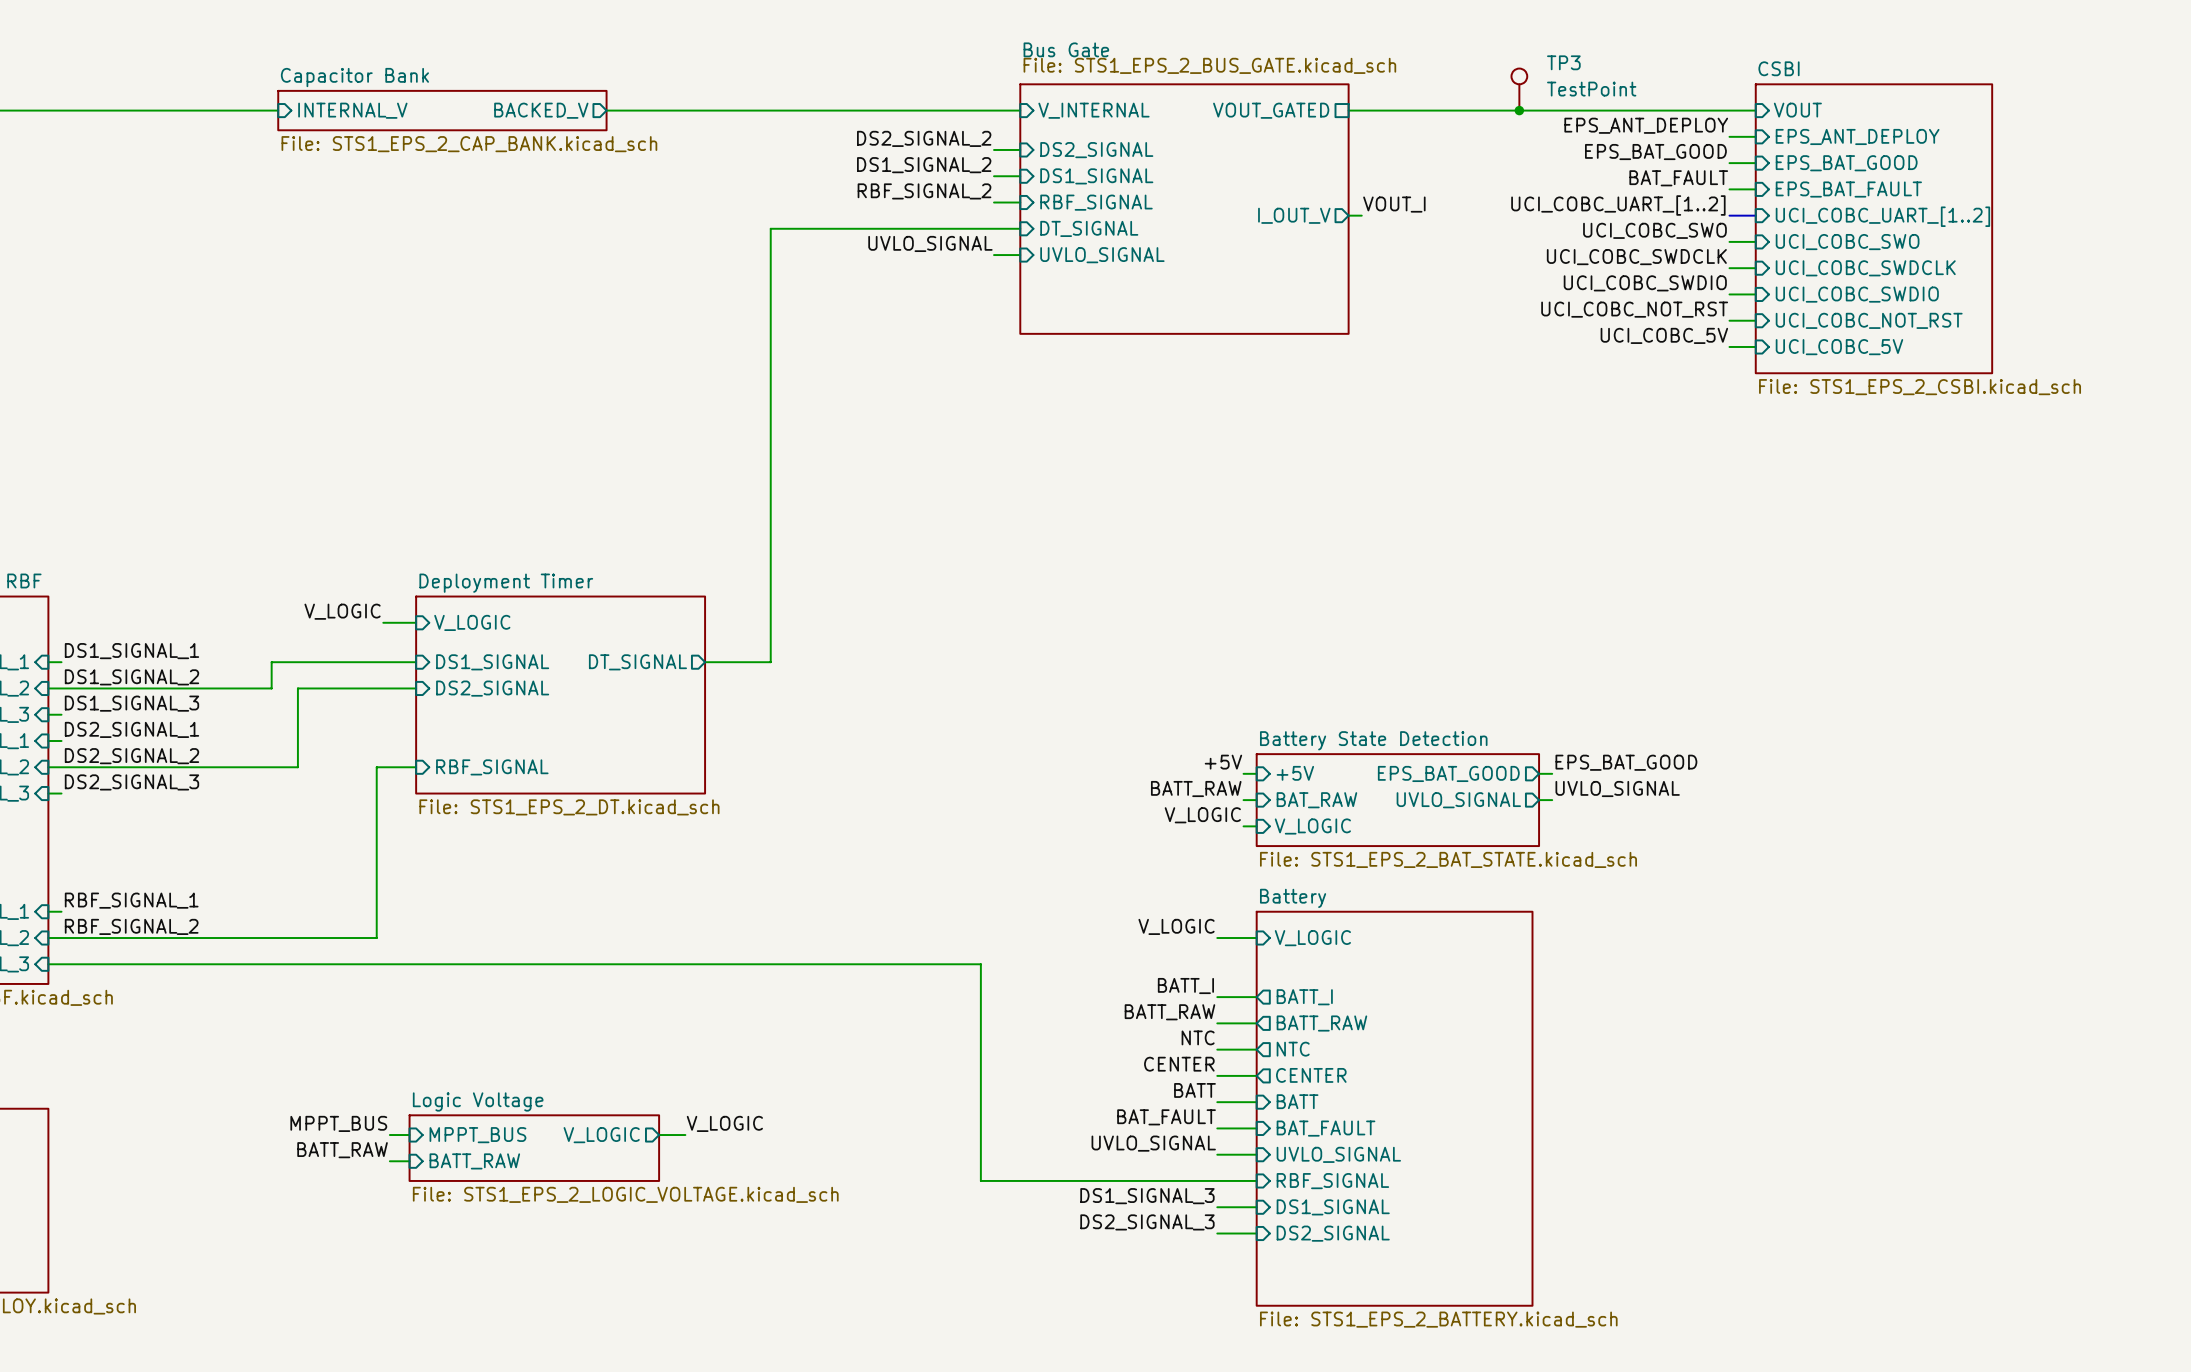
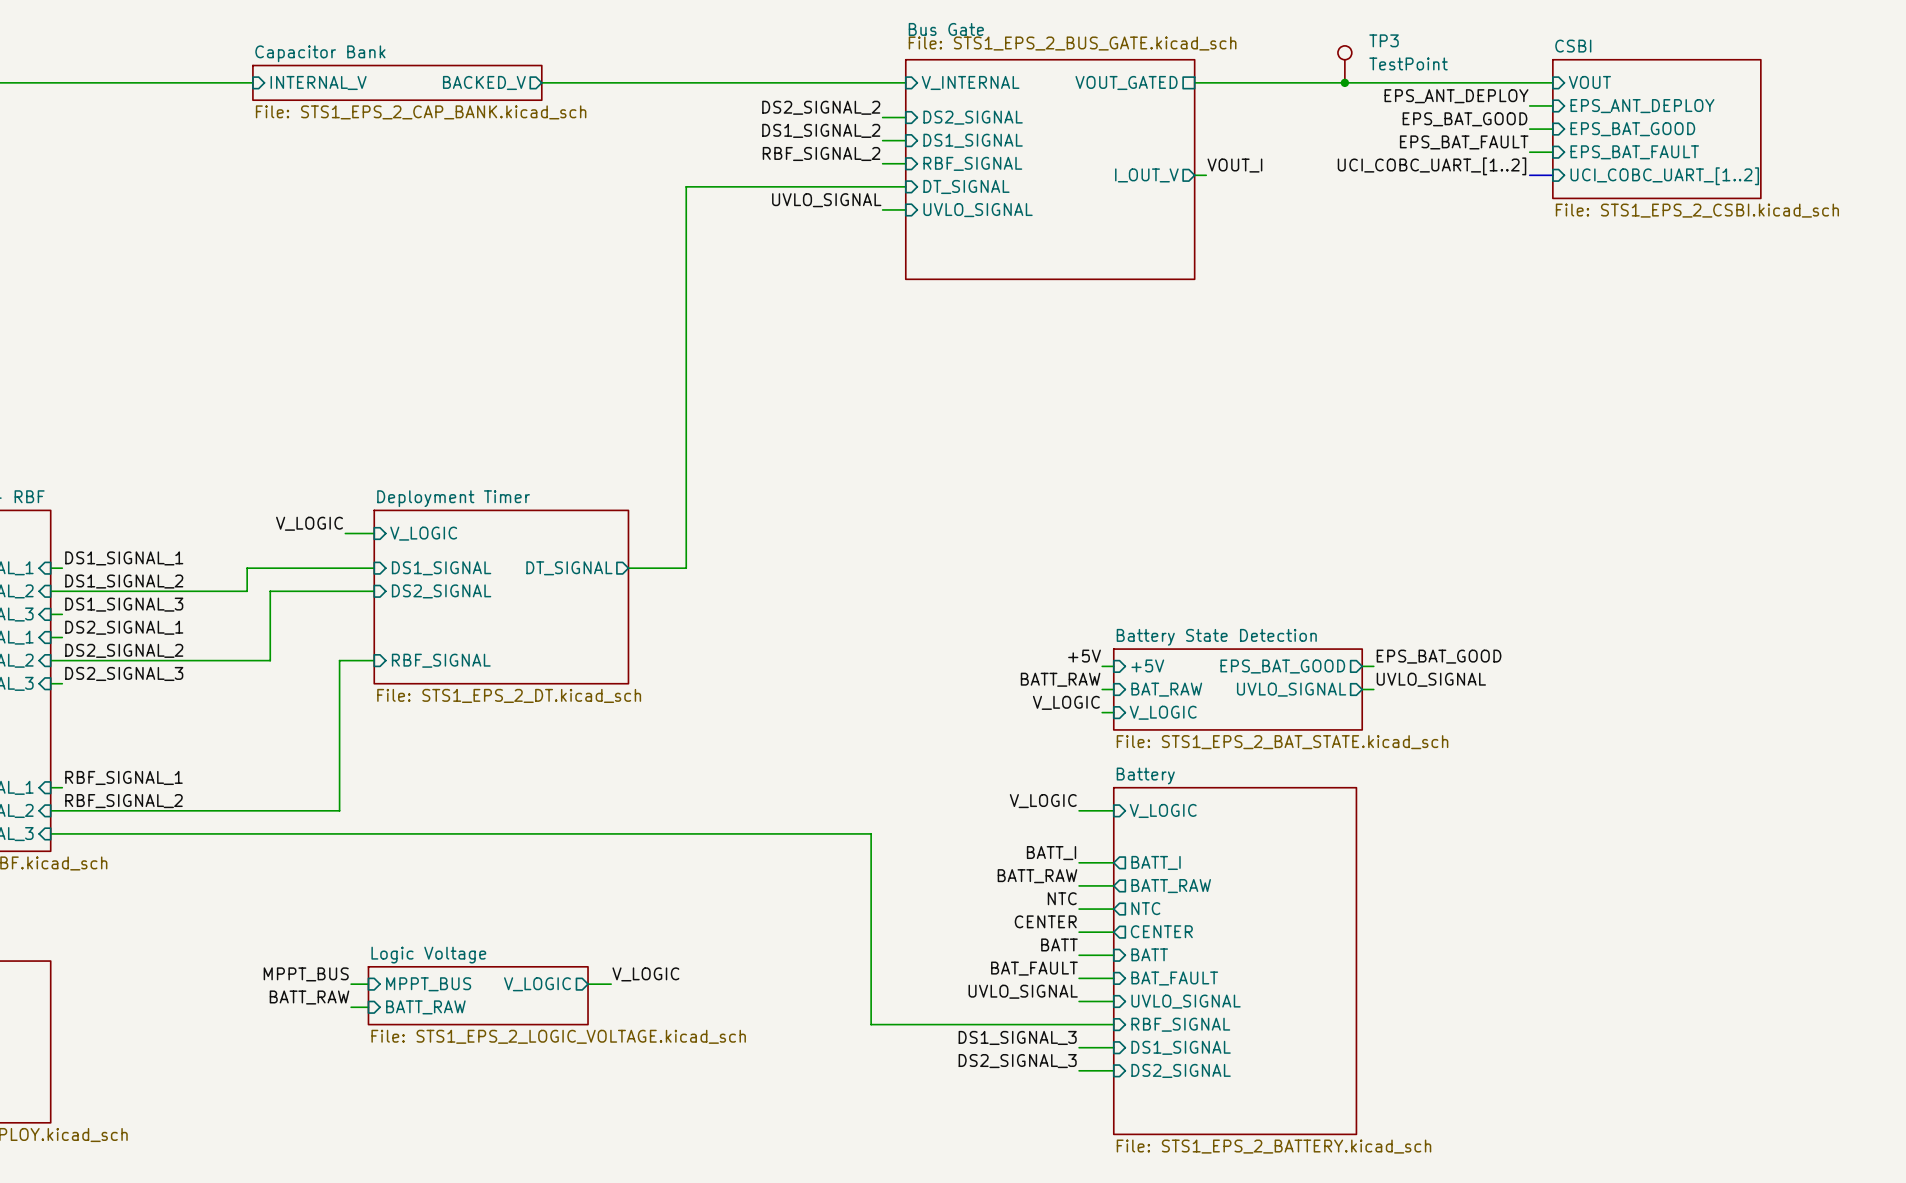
sheet CSBI: none -> File: STS1_EPS_2_CSBI.kicad_sch (1656, 129)
label: BAT_FAULT (1678, 178) -> EPS_BAT_FAULT (1464, 142)
sheet CSBI: File: STS1_EPS_2_CSBI.kicad_sch (1873, 228) -> none
label: UCI_COBC_SWO (1654, 230) -> none
wire: (1729, 241) (1755, 241) -> none
sheet pin: UCI_COBC_SWO (1847, 242) -> none
label: UCI_COBC_SWDCLK (1636, 257) -> none
wire: (1729, 268) (1755, 268) -> none
sheet pin: UCI_COBC_SWDCLK (1865, 268) -> none
label: UCI_COBC_SWDIO (1645, 283) -> none
wire: (1729, 294) (1755, 294) -> none
sheet pin: UCI_COBC_SWDIO (1857, 294) -> none
label: UCI_COBC_NOT_RST (1634, 309) -> none
wire: (1729, 320) (1755, 320) -> none
sheet pin: UCI_COBC_NOT_RST (1869, 320) -> none
label: UCI_COBC_5V (1664, 335) -> none
wire: (1729, 346) (1755, 346) -> none
sheet pin: UCI_COBC_5V (1839, 347) -> none

